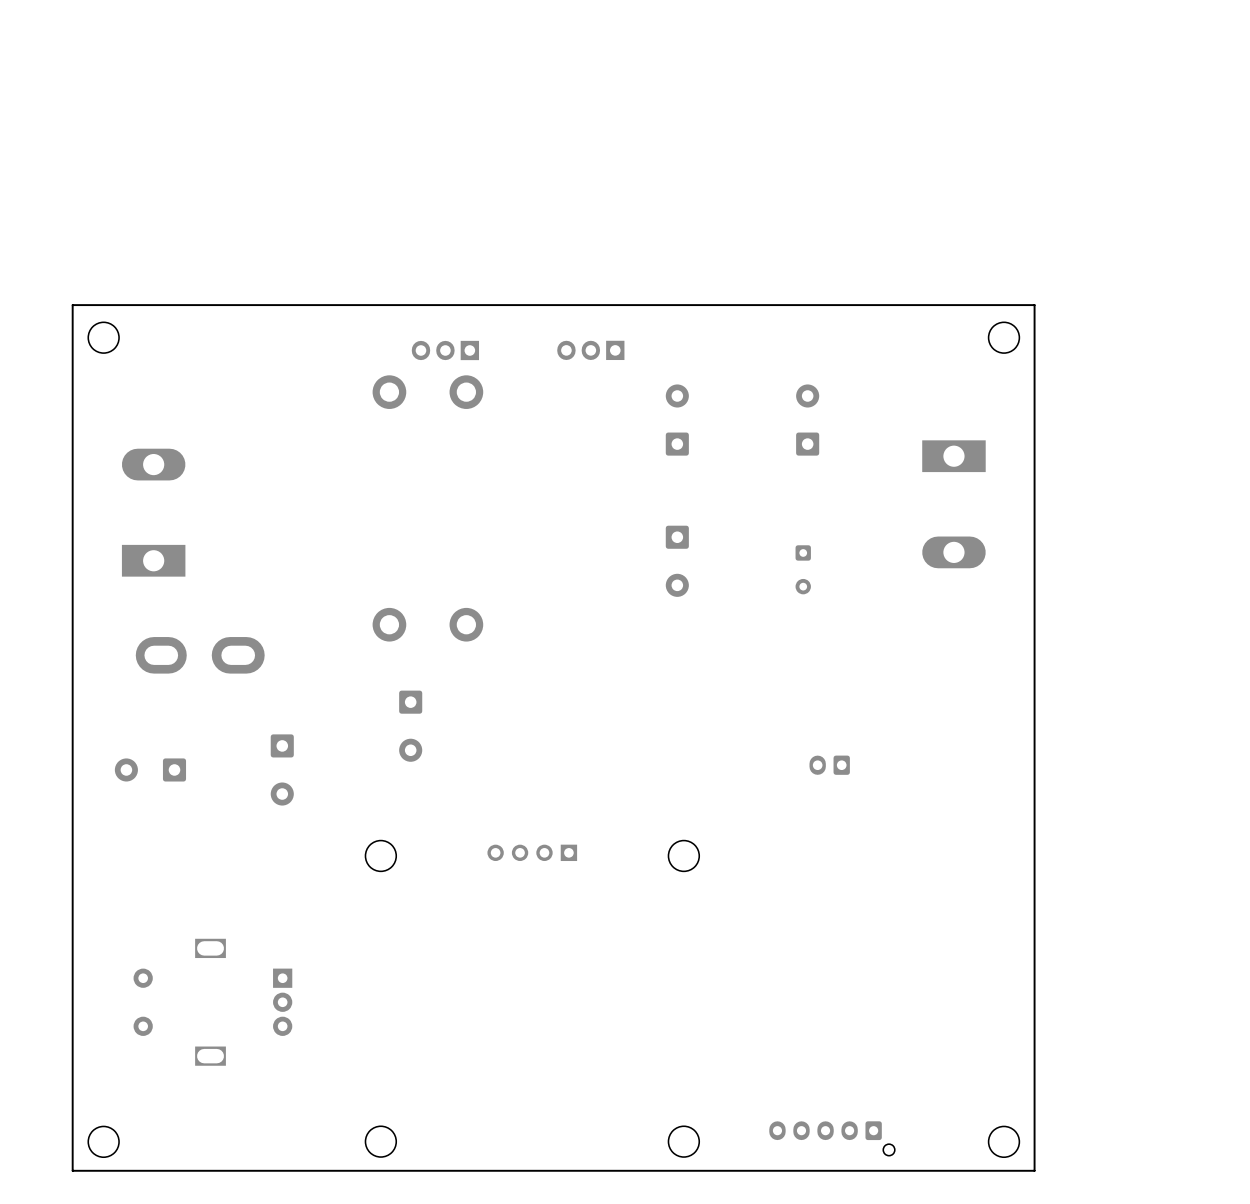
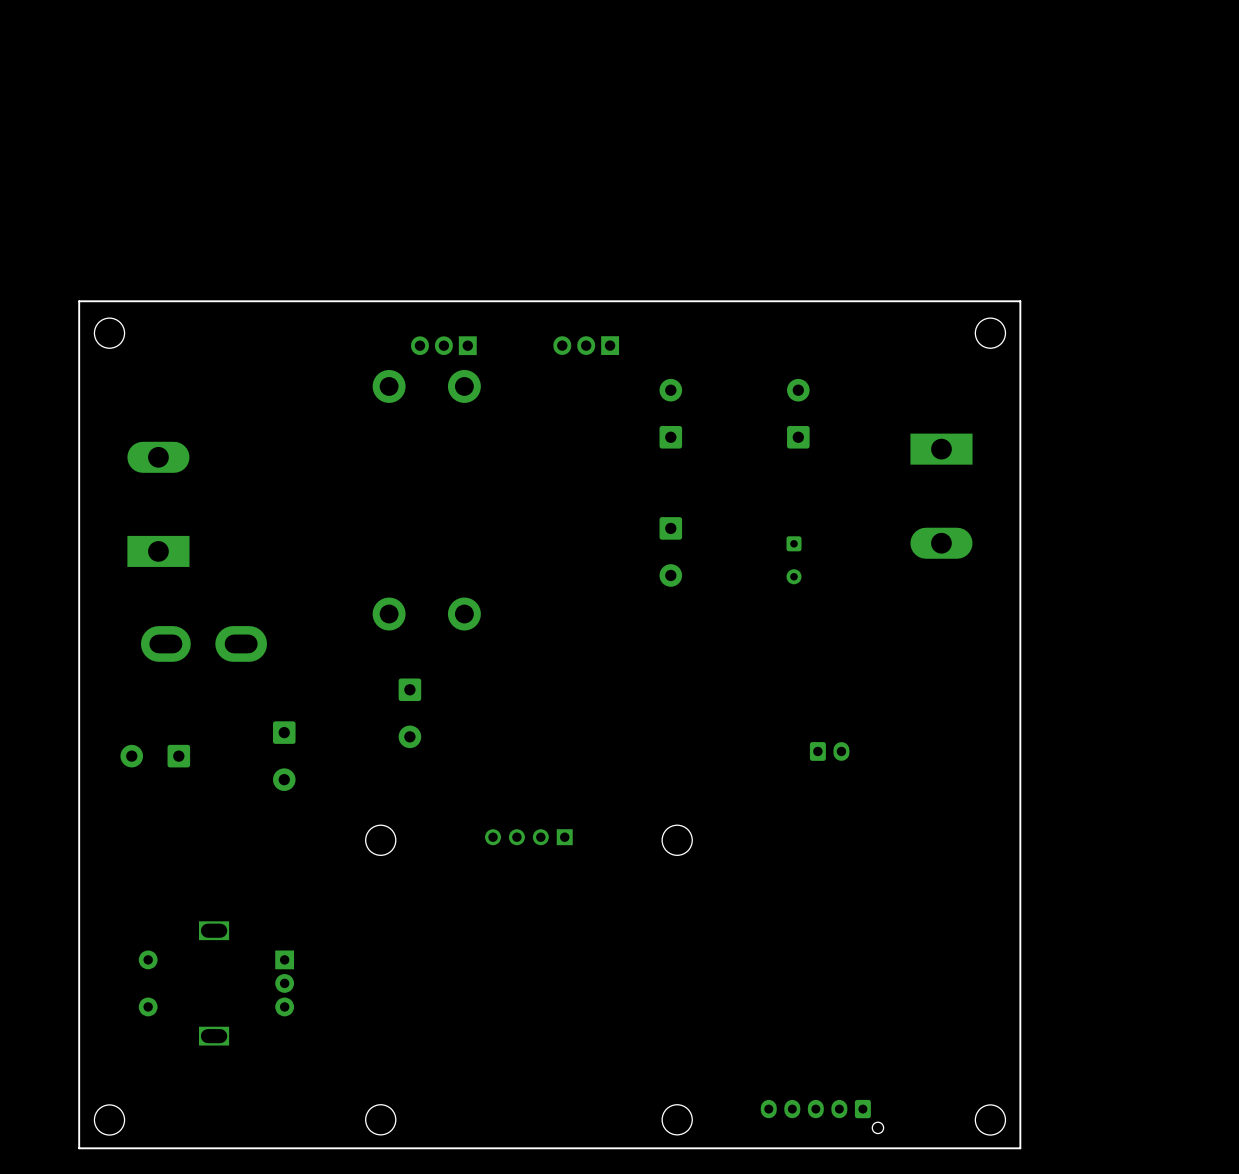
part rotation: 0° (829, 765) -> 180° (829, 751)

